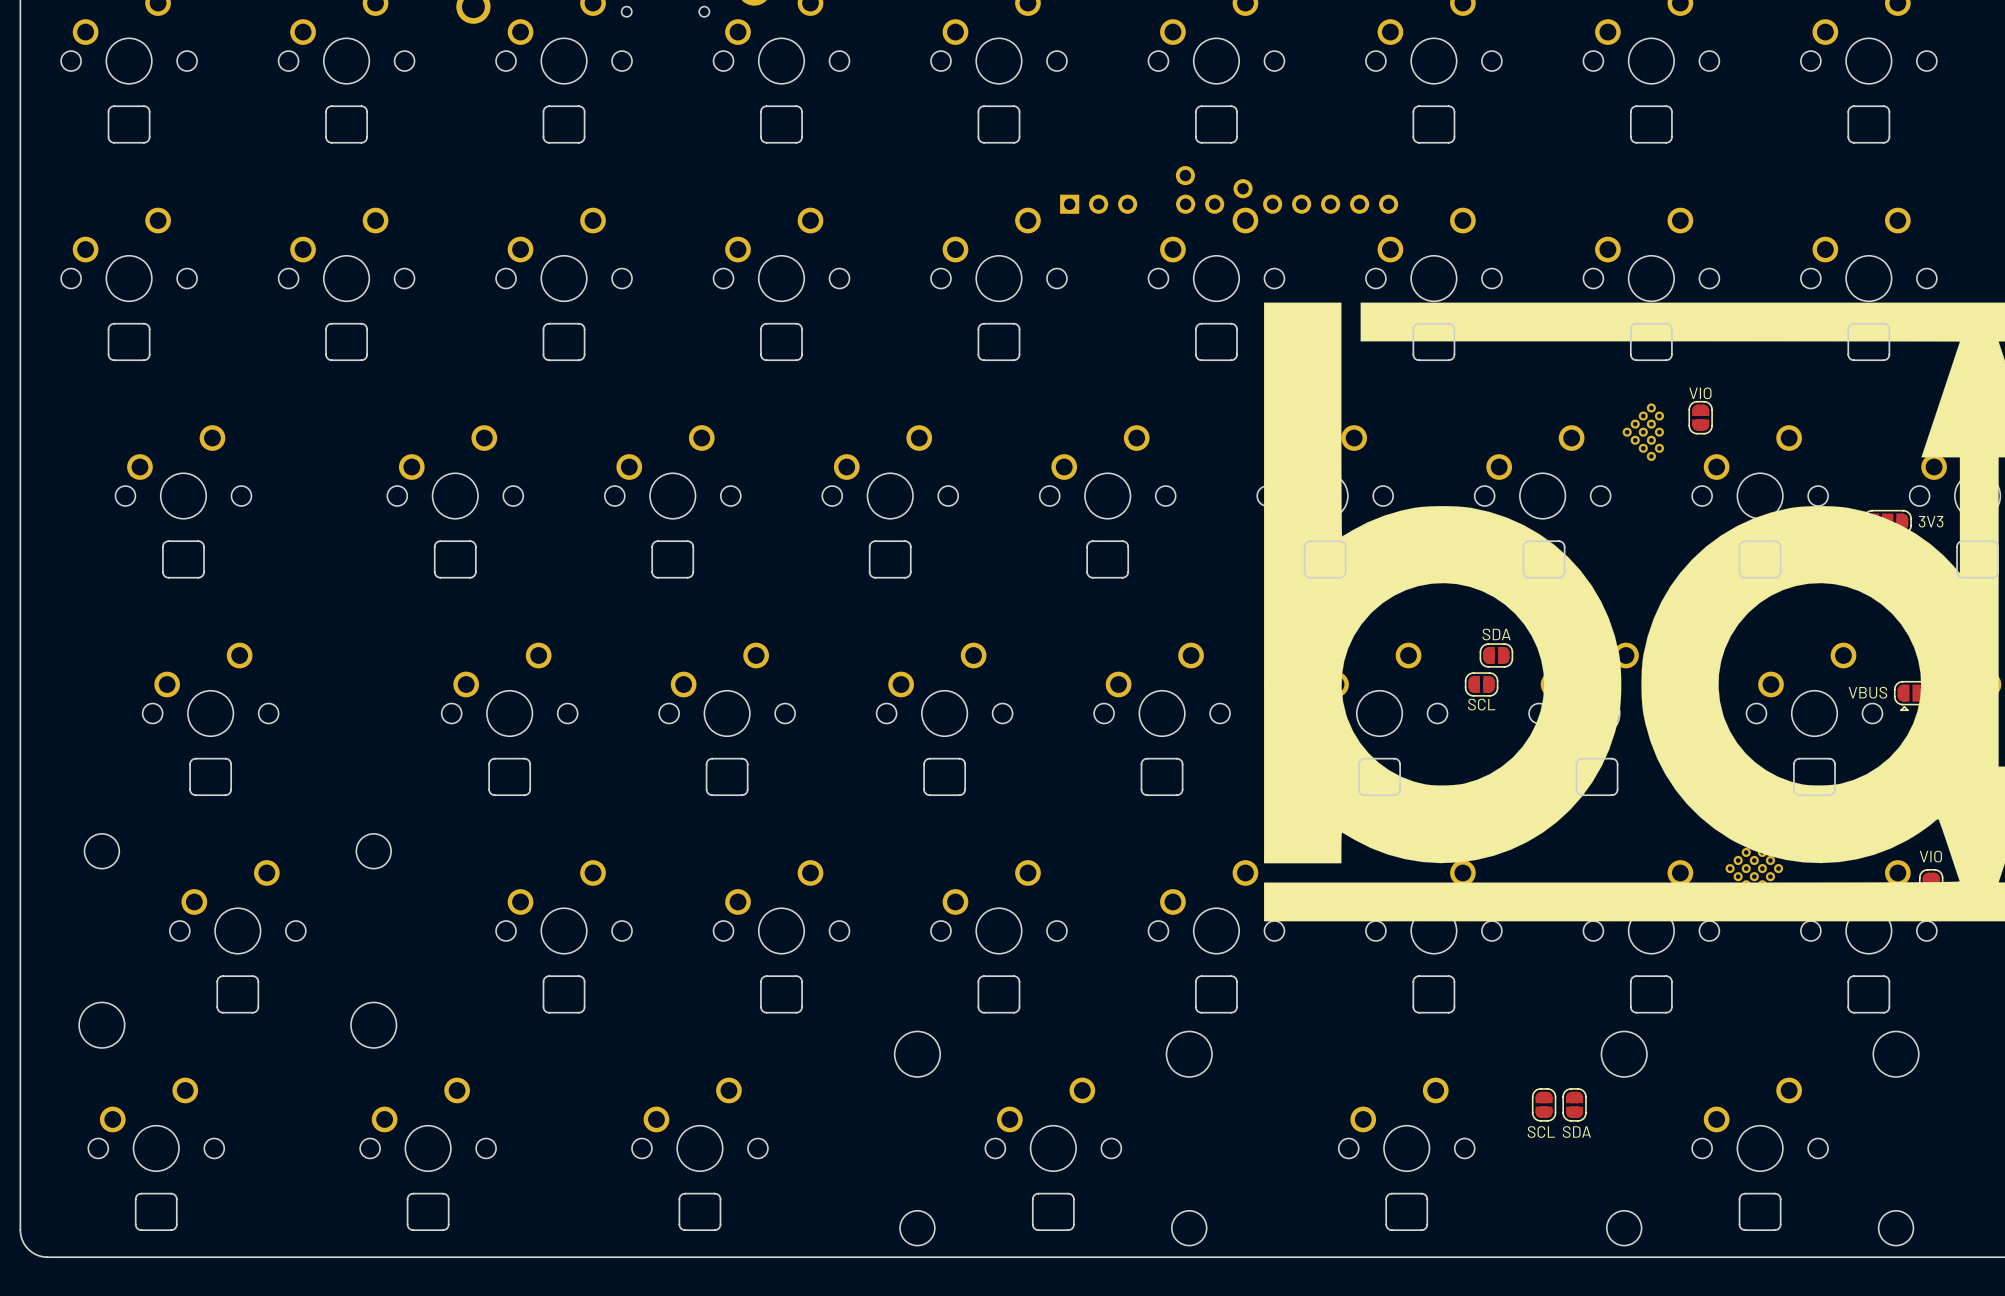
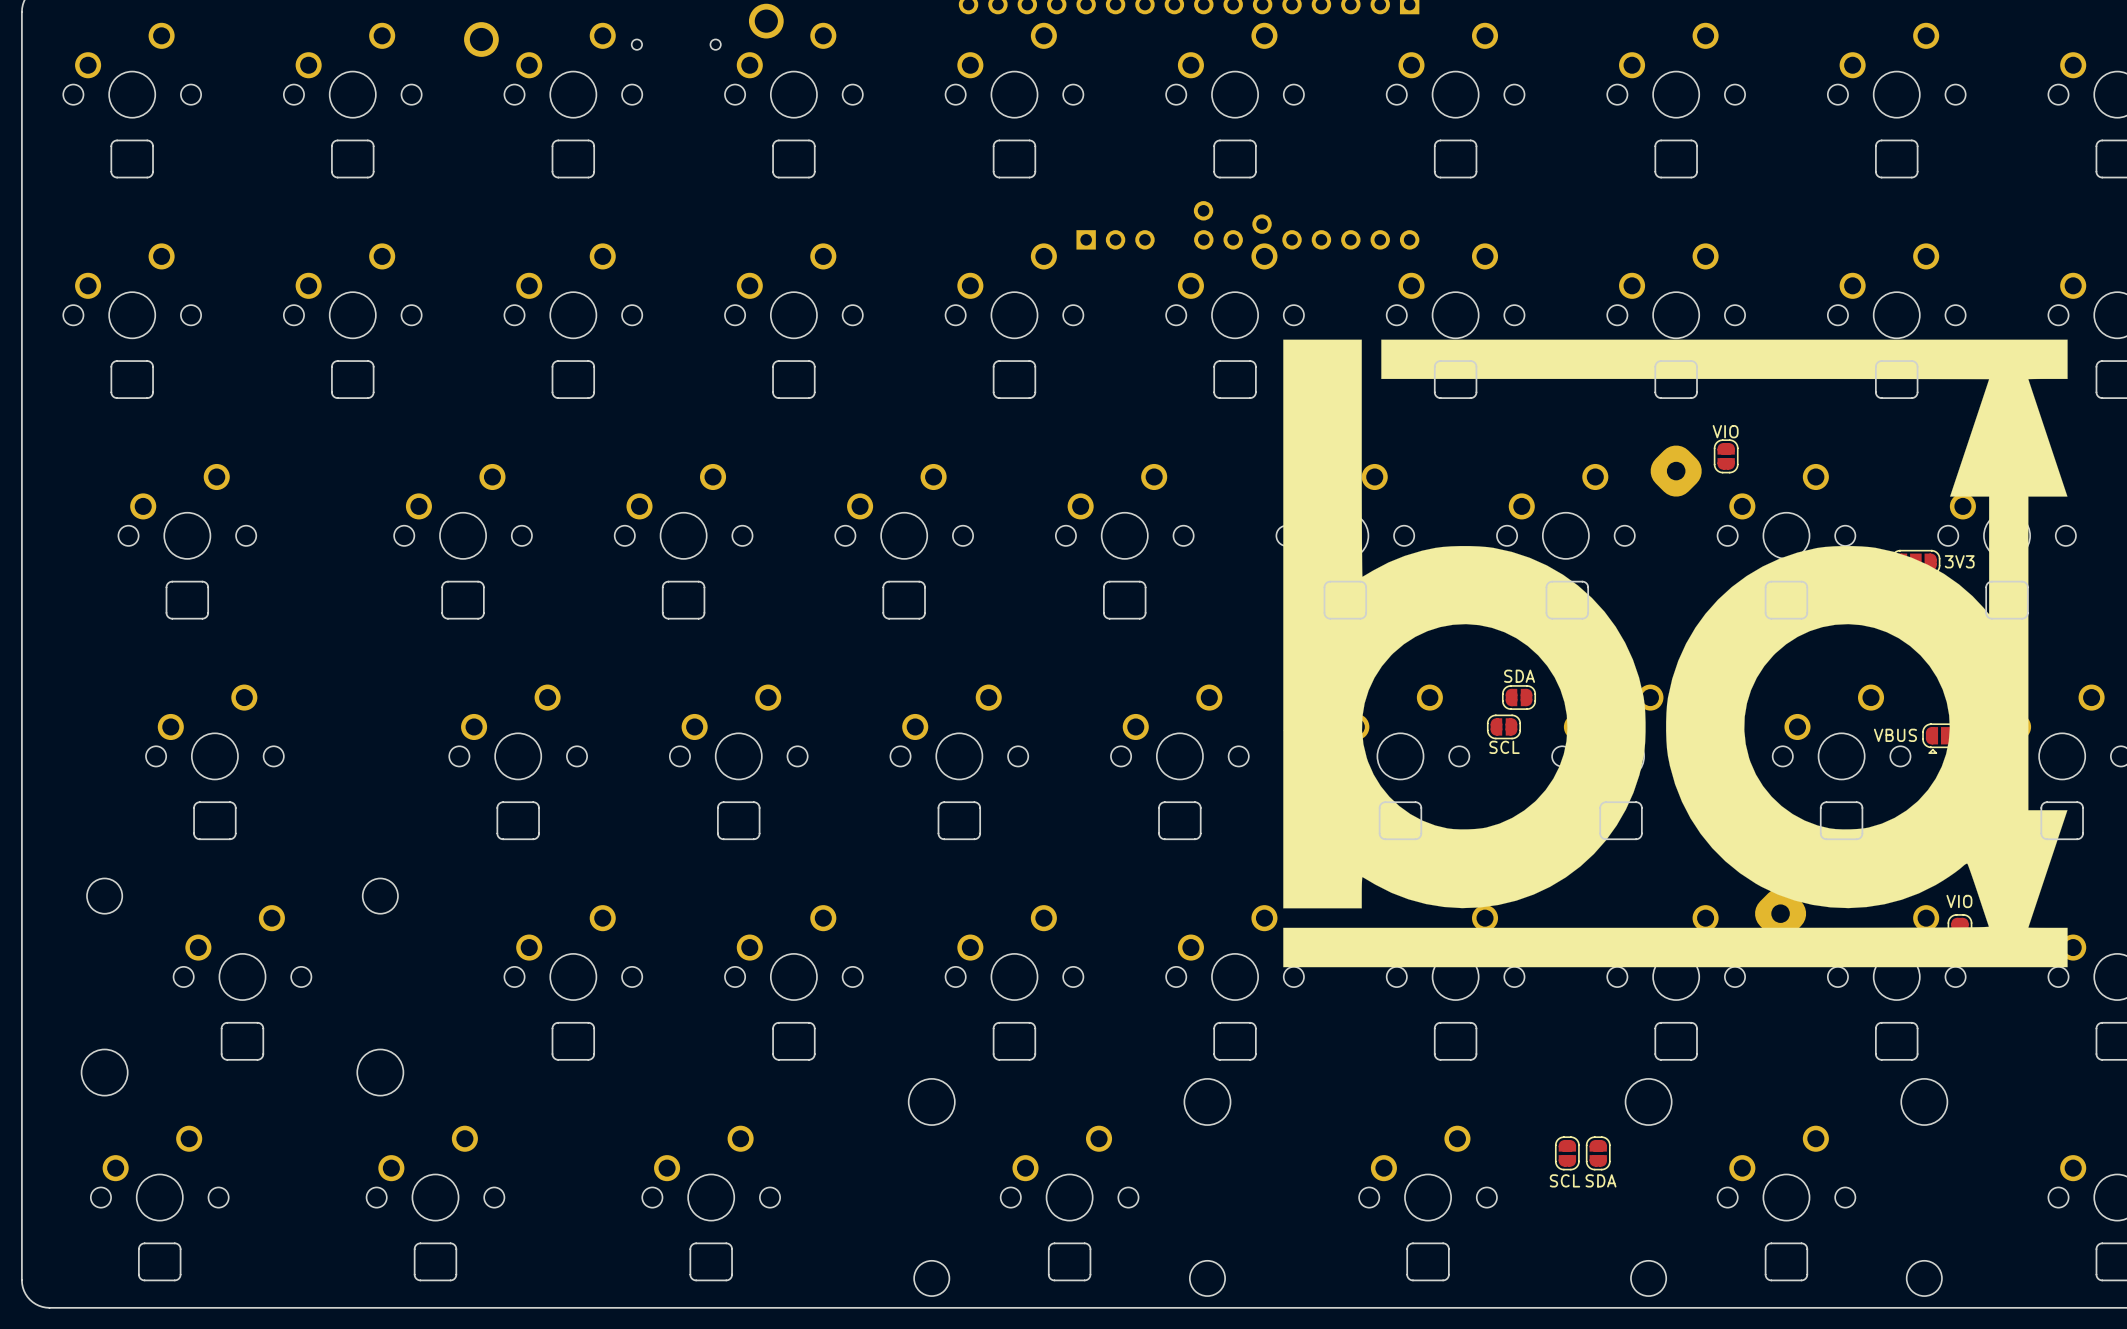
part footprint: [1622, 403, 1665, 461] -> [1650, 445, 1702, 497]
part footprint: [1725, 839, 1784, 898] -> [1755, 888, 1807, 940]

